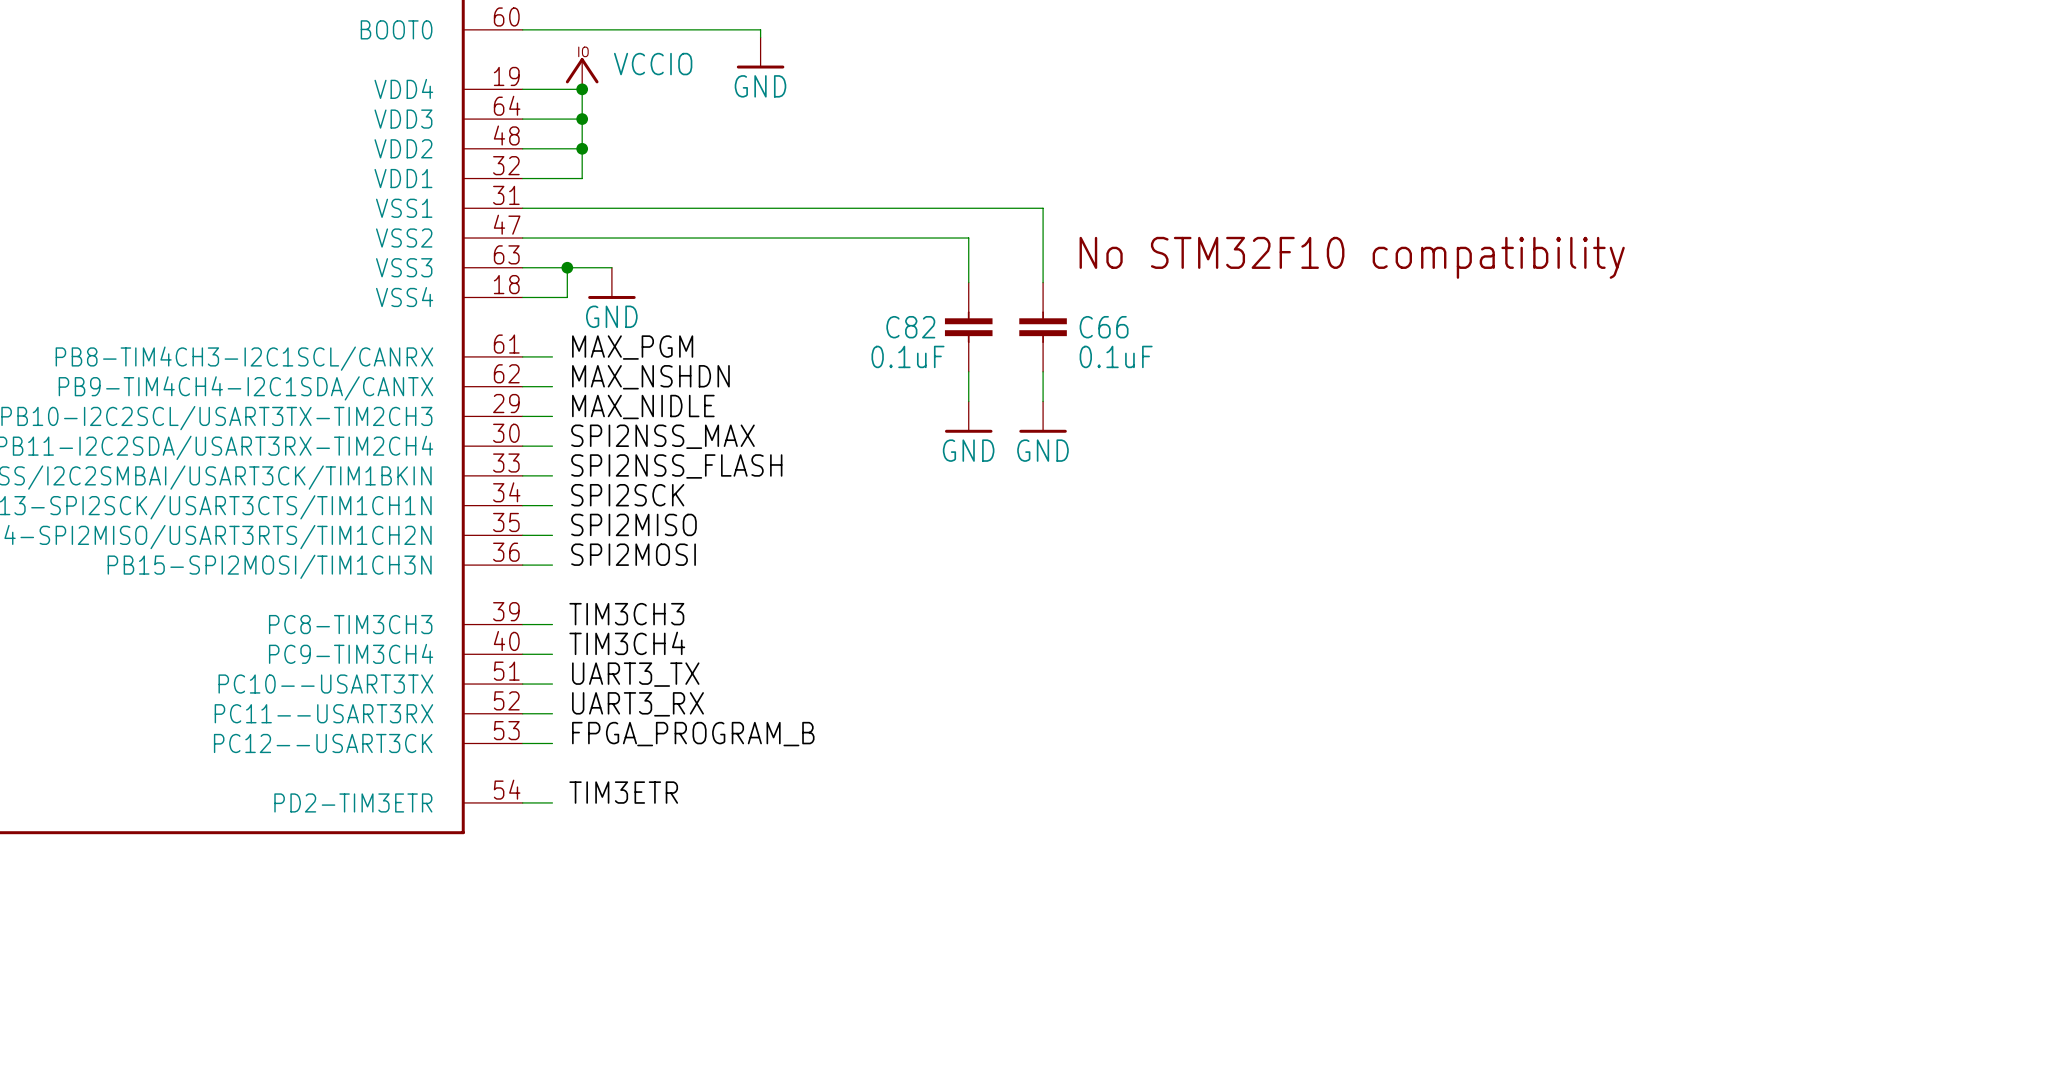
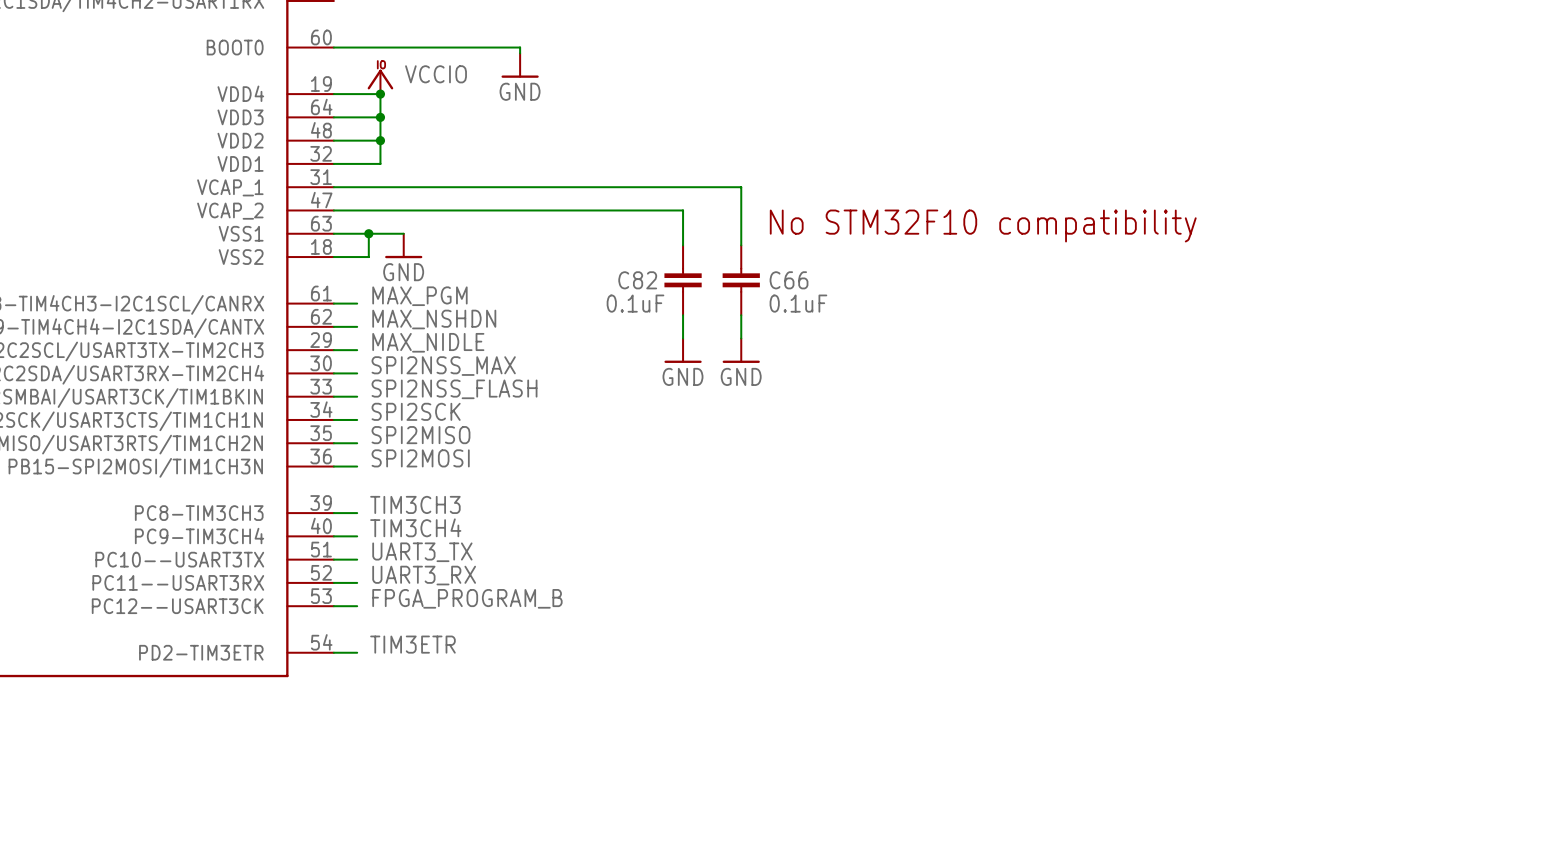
part pin name: VSS1 (404, 208) -> VCAP_1 (230, 187)
part pin name: VSS2 (404, 238) -> VCAP_2 (230, 211)
part pin name: VSS3 (404, 267) -> VSS1 (241, 233)
part pin name: VSS4 (404, 297) -> VSS2 (241, 257)

